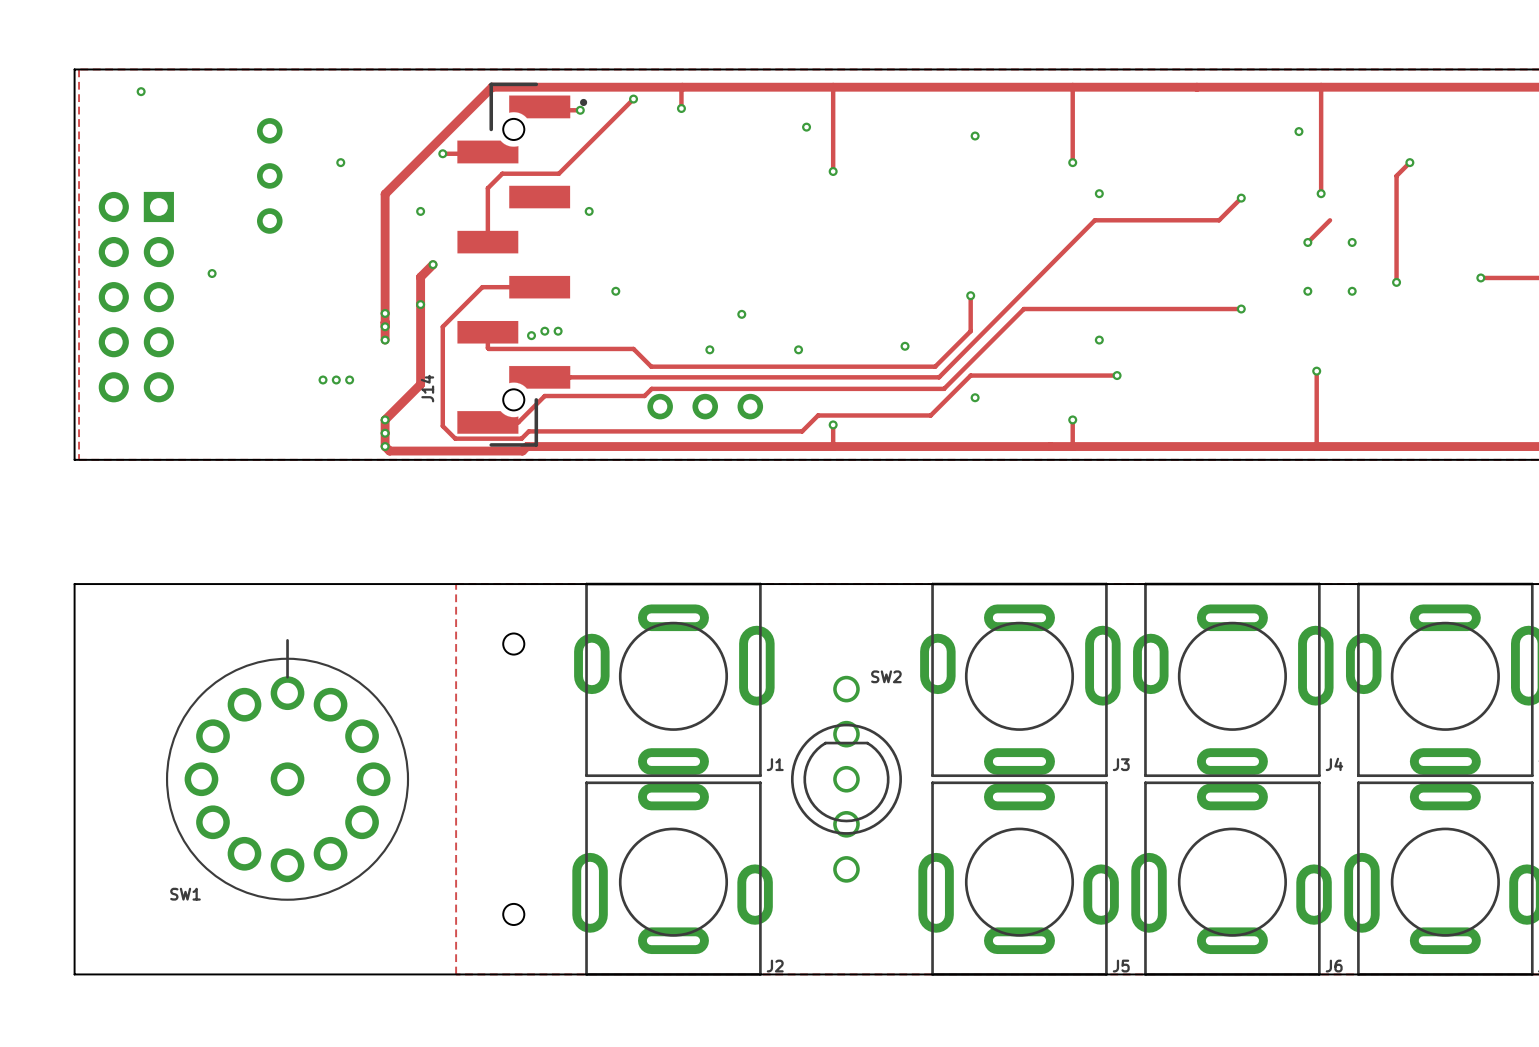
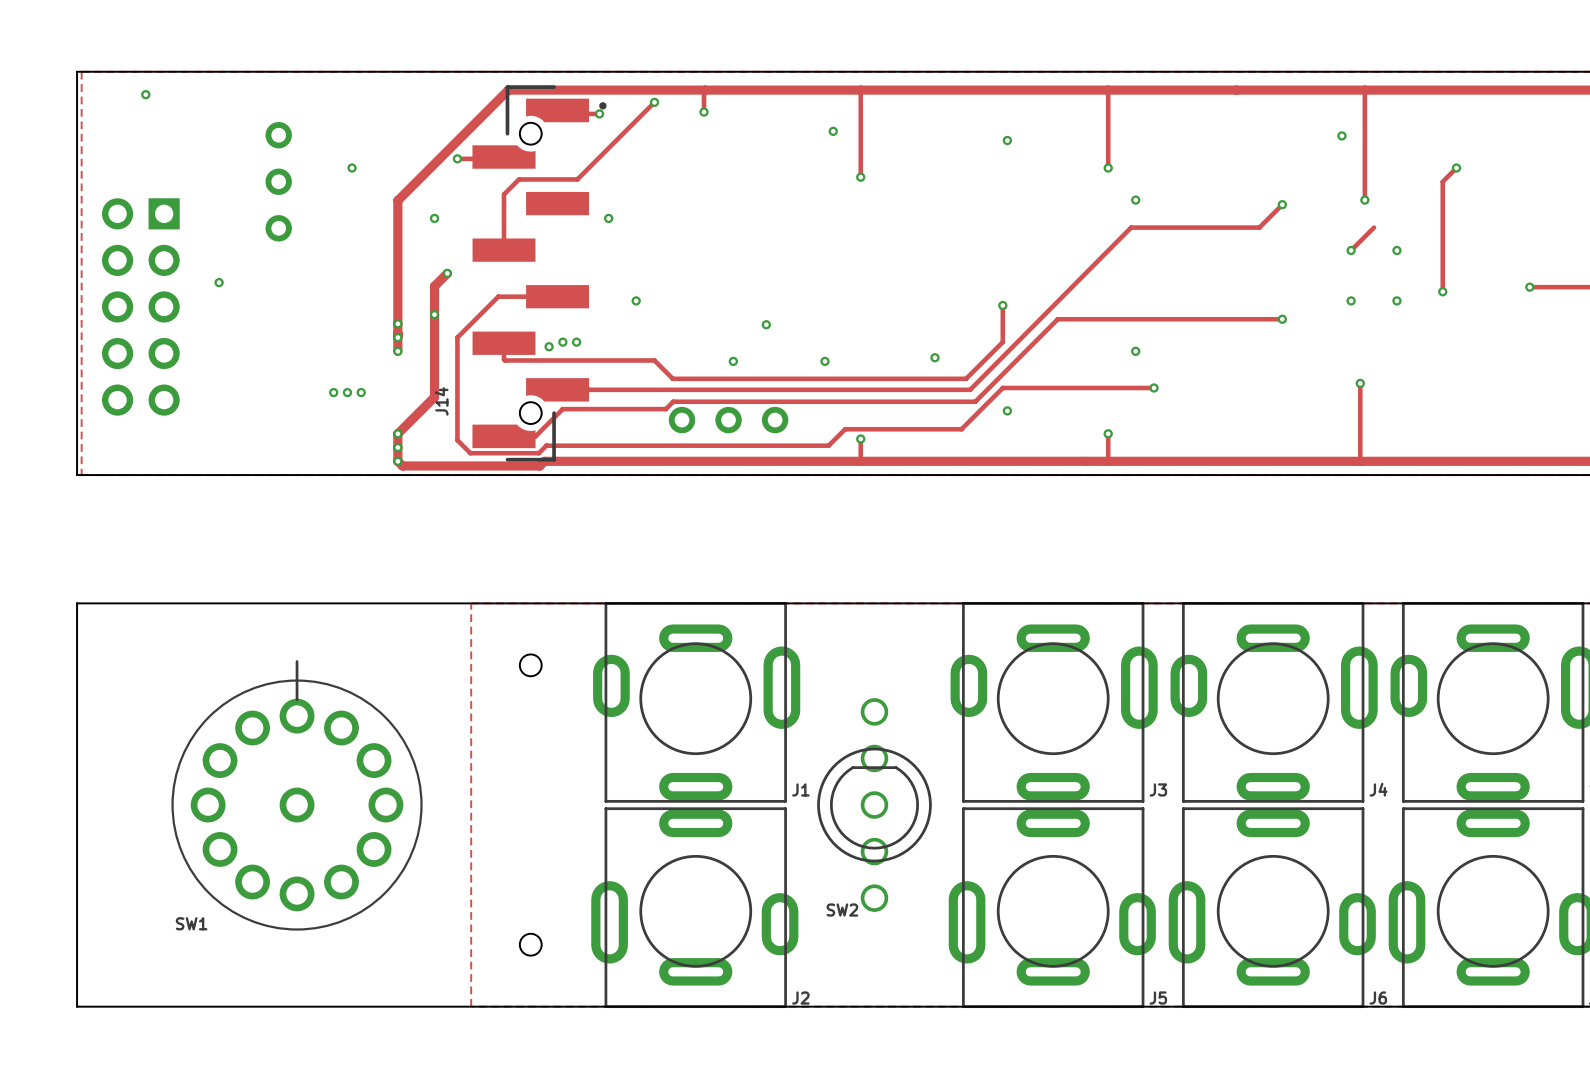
SW2 name position: SW2 (886, 676) -> SW2 (842, 910)

